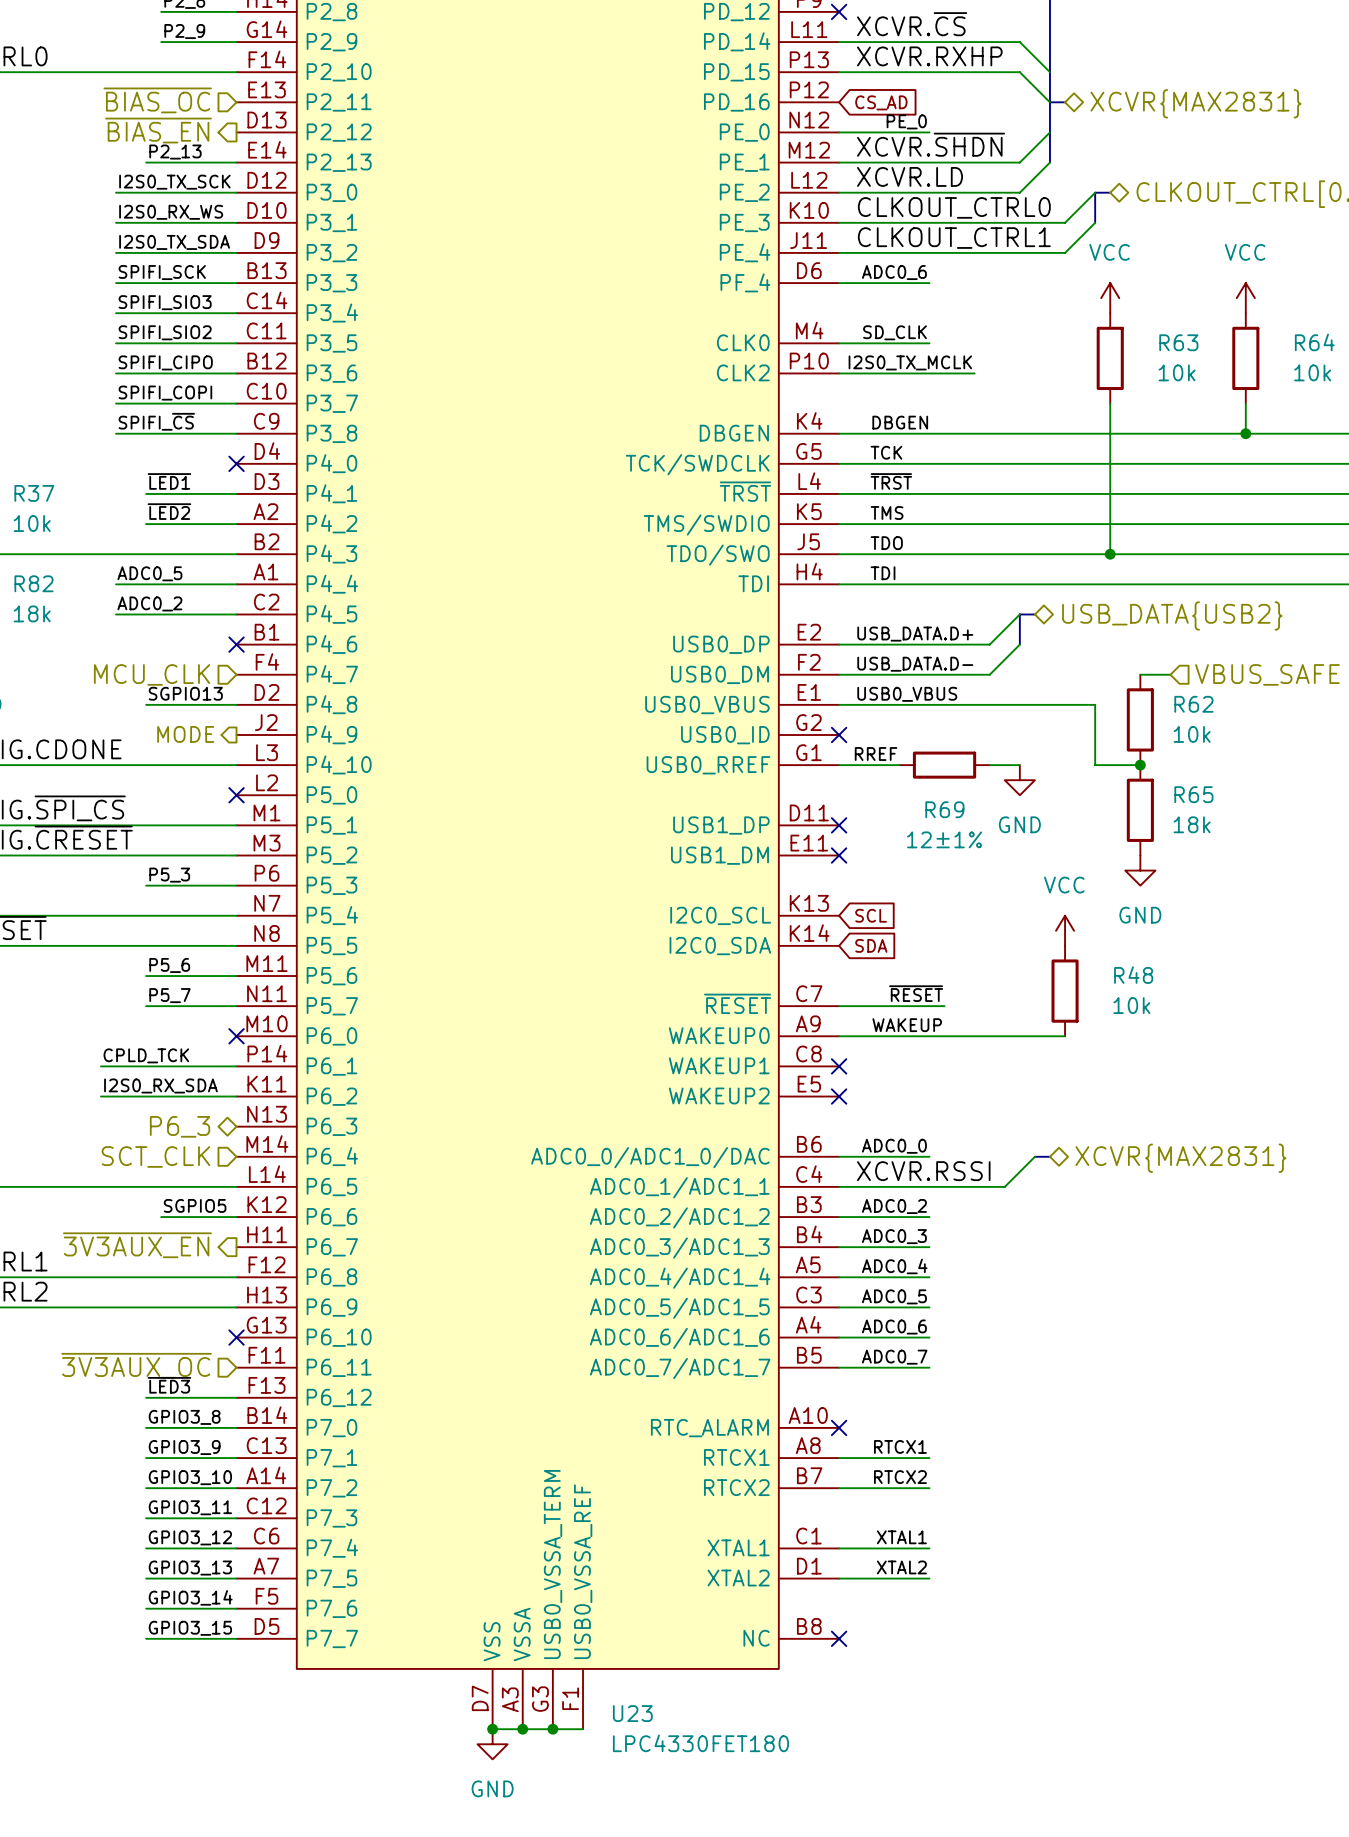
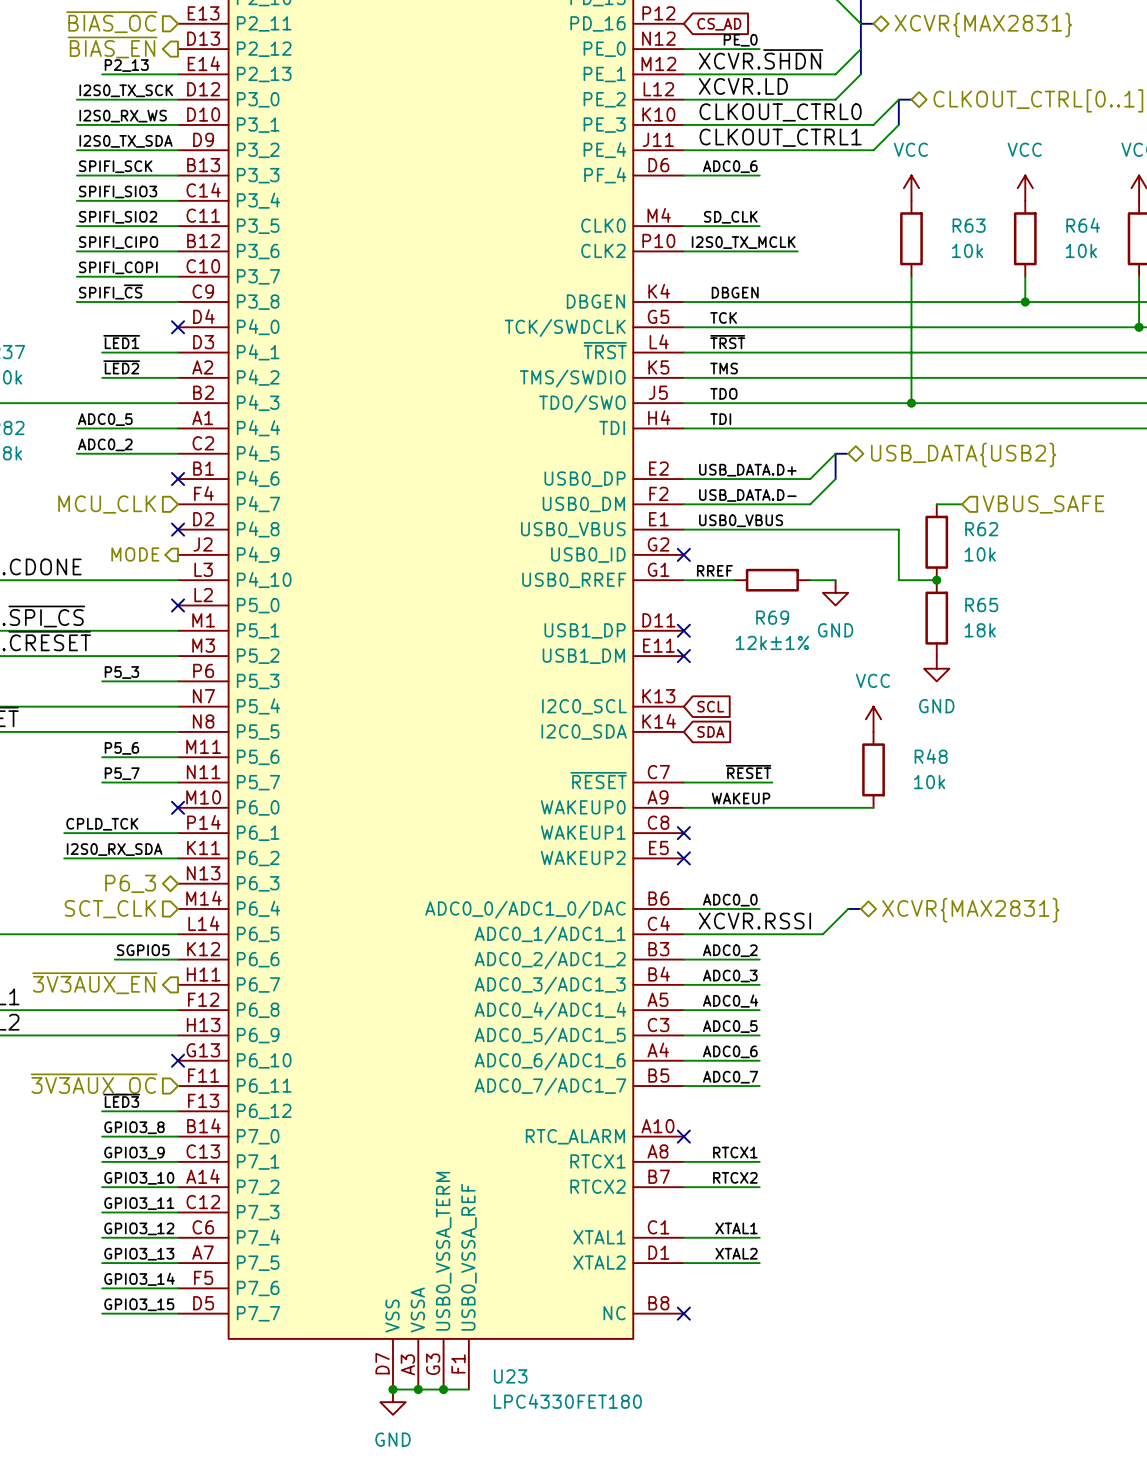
label: SGPIO13 (185, 693) -> none
wire: (146, 704) (236, 704) -> none
no-connect mark: none -> (178, 529)
R69 value: 12±1% (944, 839) -> 12k±1% (772, 642)

